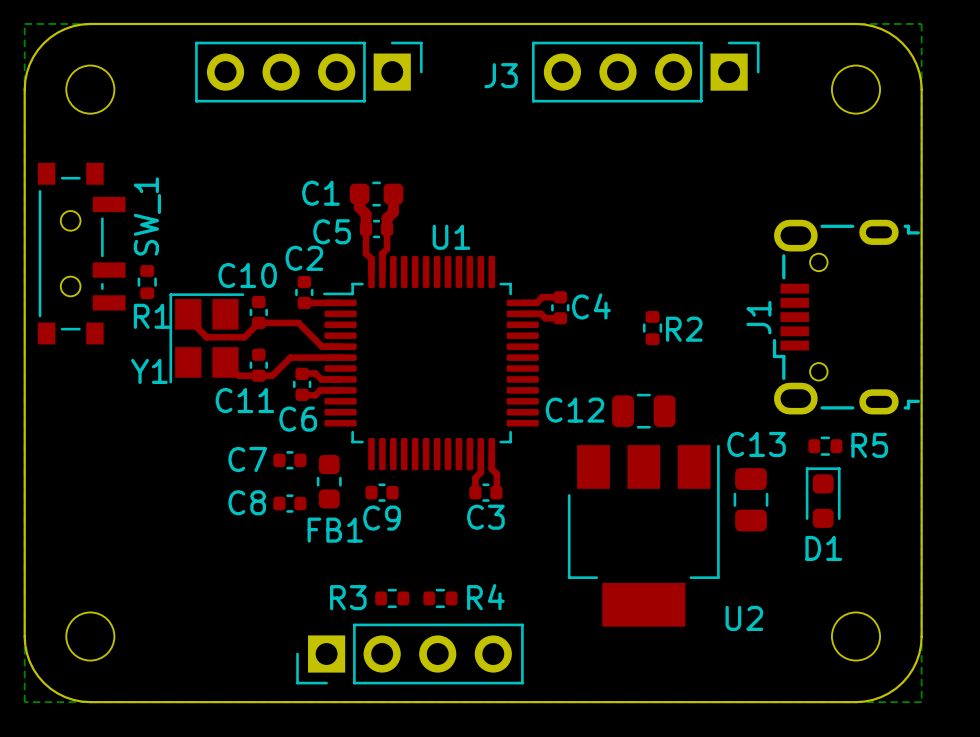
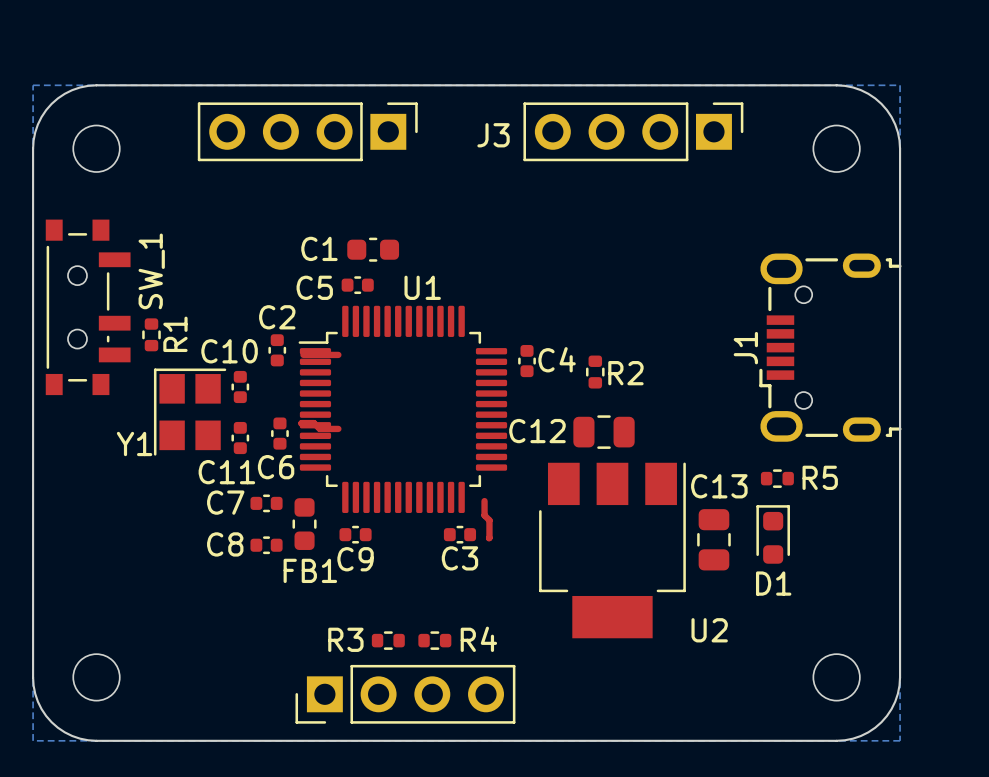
top track: (359, 194) (359, 207) (366, 214) (366, 253) (371, 258) (371, 271) -> none
top track: (393, 194) (393, 212) (387, 218) (387, 248) (382, 253) (382, 271) -> none
C5 position: (376, 229) -> (357, 285)
C2 position: (304, 292) -> (277, 350)
top track: (560, 297) (542, 297) (536, 302) (522, 302) -> none
C4 position: (560, 307) -> (527, 361)
C10 position: (258, 312) -> (240, 386)
top track: (522, 313) (541, 313) (545, 318) (560, 318) -> none
top track: (188, 314) (188, 318) (206, 337) (244, 337) (258, 322) (298, 322) (322, 346) (340, 346) -> none
R1 name rotation: 0° (152, 316) -> 90° counterclockwise (175, 334)
J1 position: (846, 317) -> (830, 347)
R2 position: (652, 328) -> (595, 372)
Y1 position: (206, 338) -> (190, 412)
top track: (340, 357) (290, 357) (272, 375) (238, 375) (225, 362) -> none
U1 position: (430, 363) -> (402, 409)
C11 position: (258, 365) -> (240, 438)
C6 position: (302, 384) -> (279, 433)
top track: (340, 390) (320, 390) (315, 395) (302, 394) -> none
C12 position: (643, 411) -> (604, 432)
R5 position: (825, 446) -> (777, 478)
top track: (480, 454) (480, 472) (475, 477) (475, 492) -> none
C7 position: (289, 460) -> (266, 503)
FB1 position: (329, 481) -> (304, 524)
C9 position: (382, 492) -> (355, 534)
C3 position: (485, 492) -> (459, 534)
D1 position: (823, 497) -> (773, 534)
C13 position: (751, 499) -> (713, 539)
C8 position: (289, 503) -> (266, 545)
U2 position: (643, 535) -> (612, 550)

